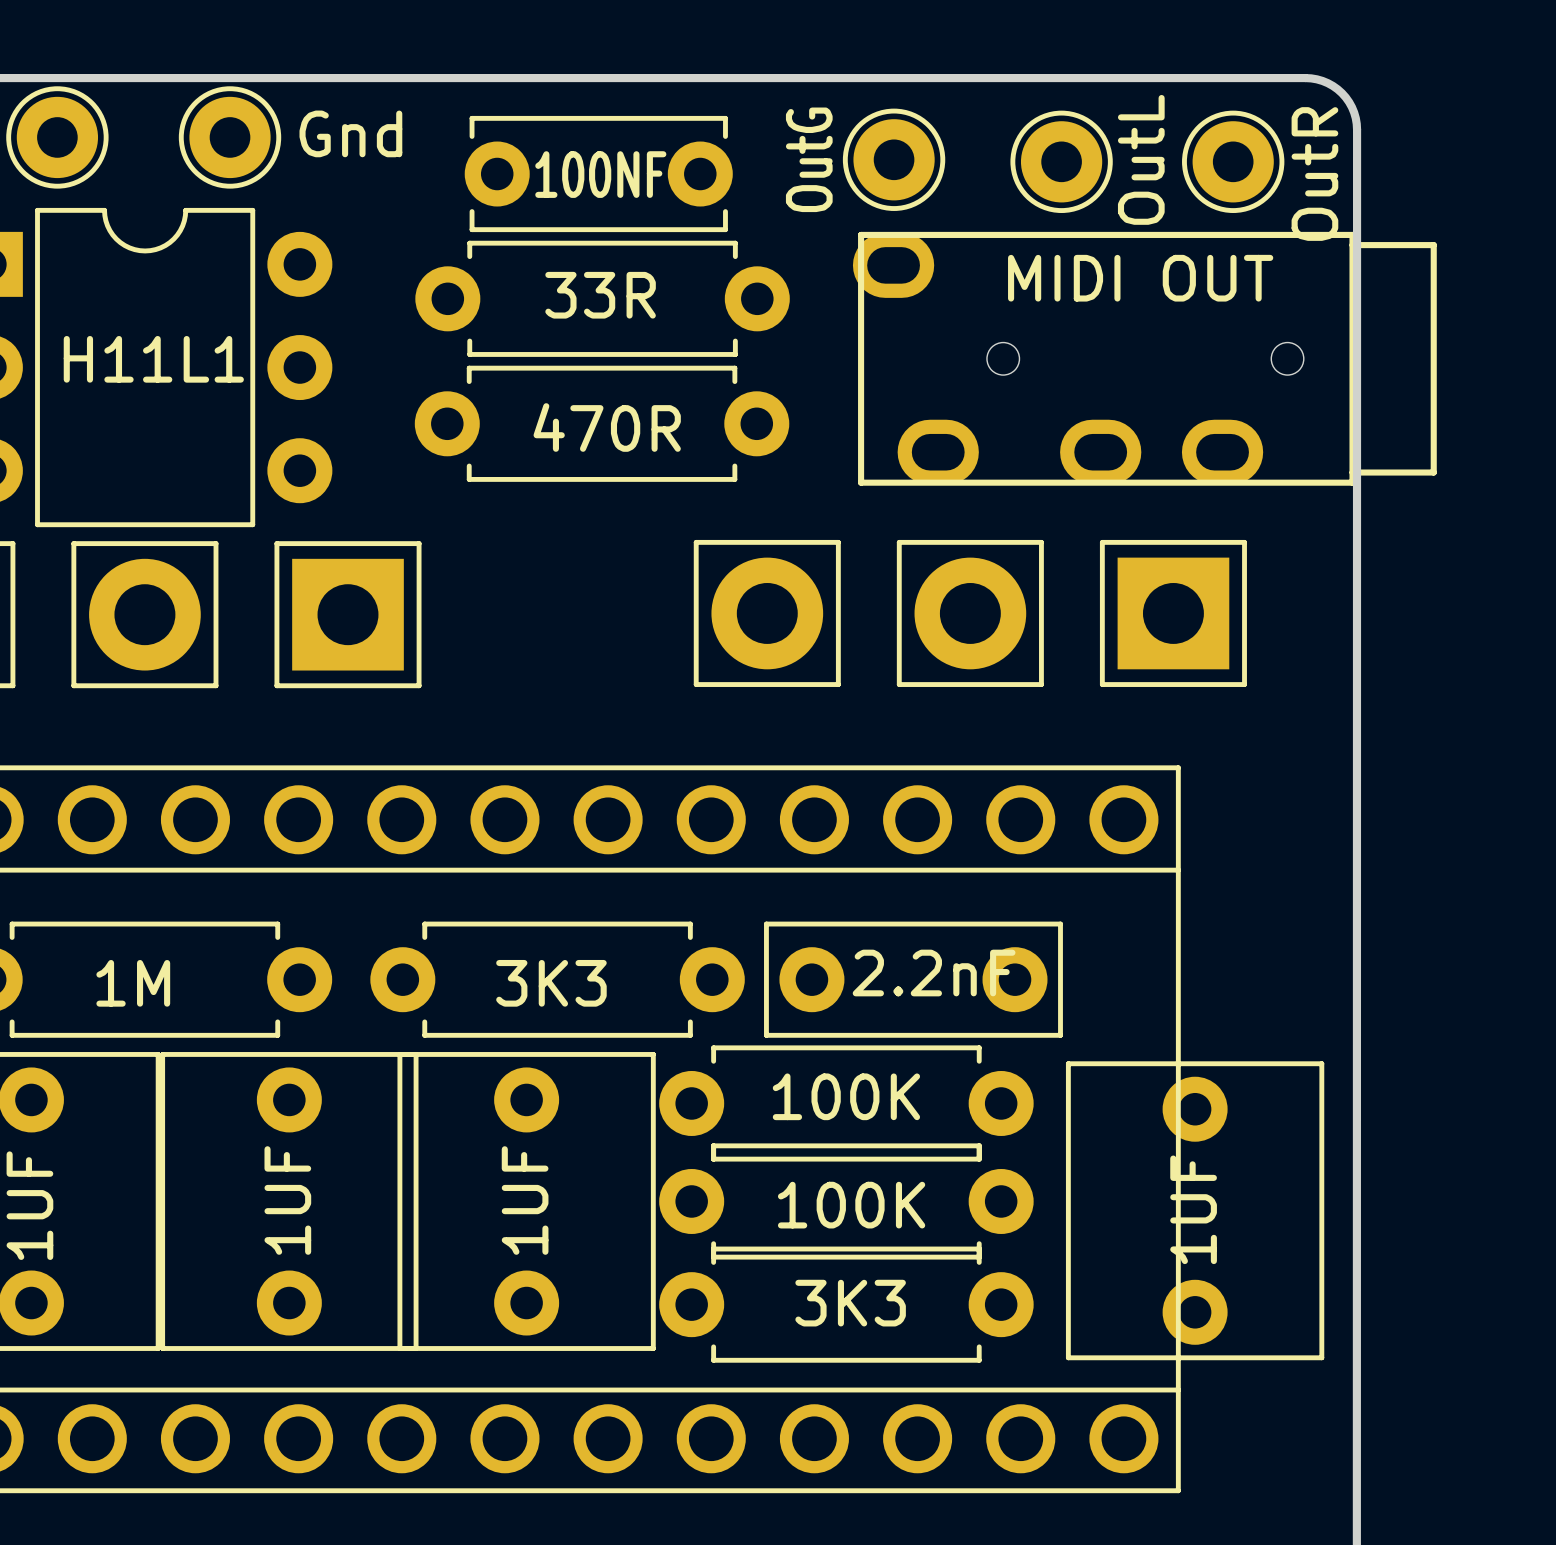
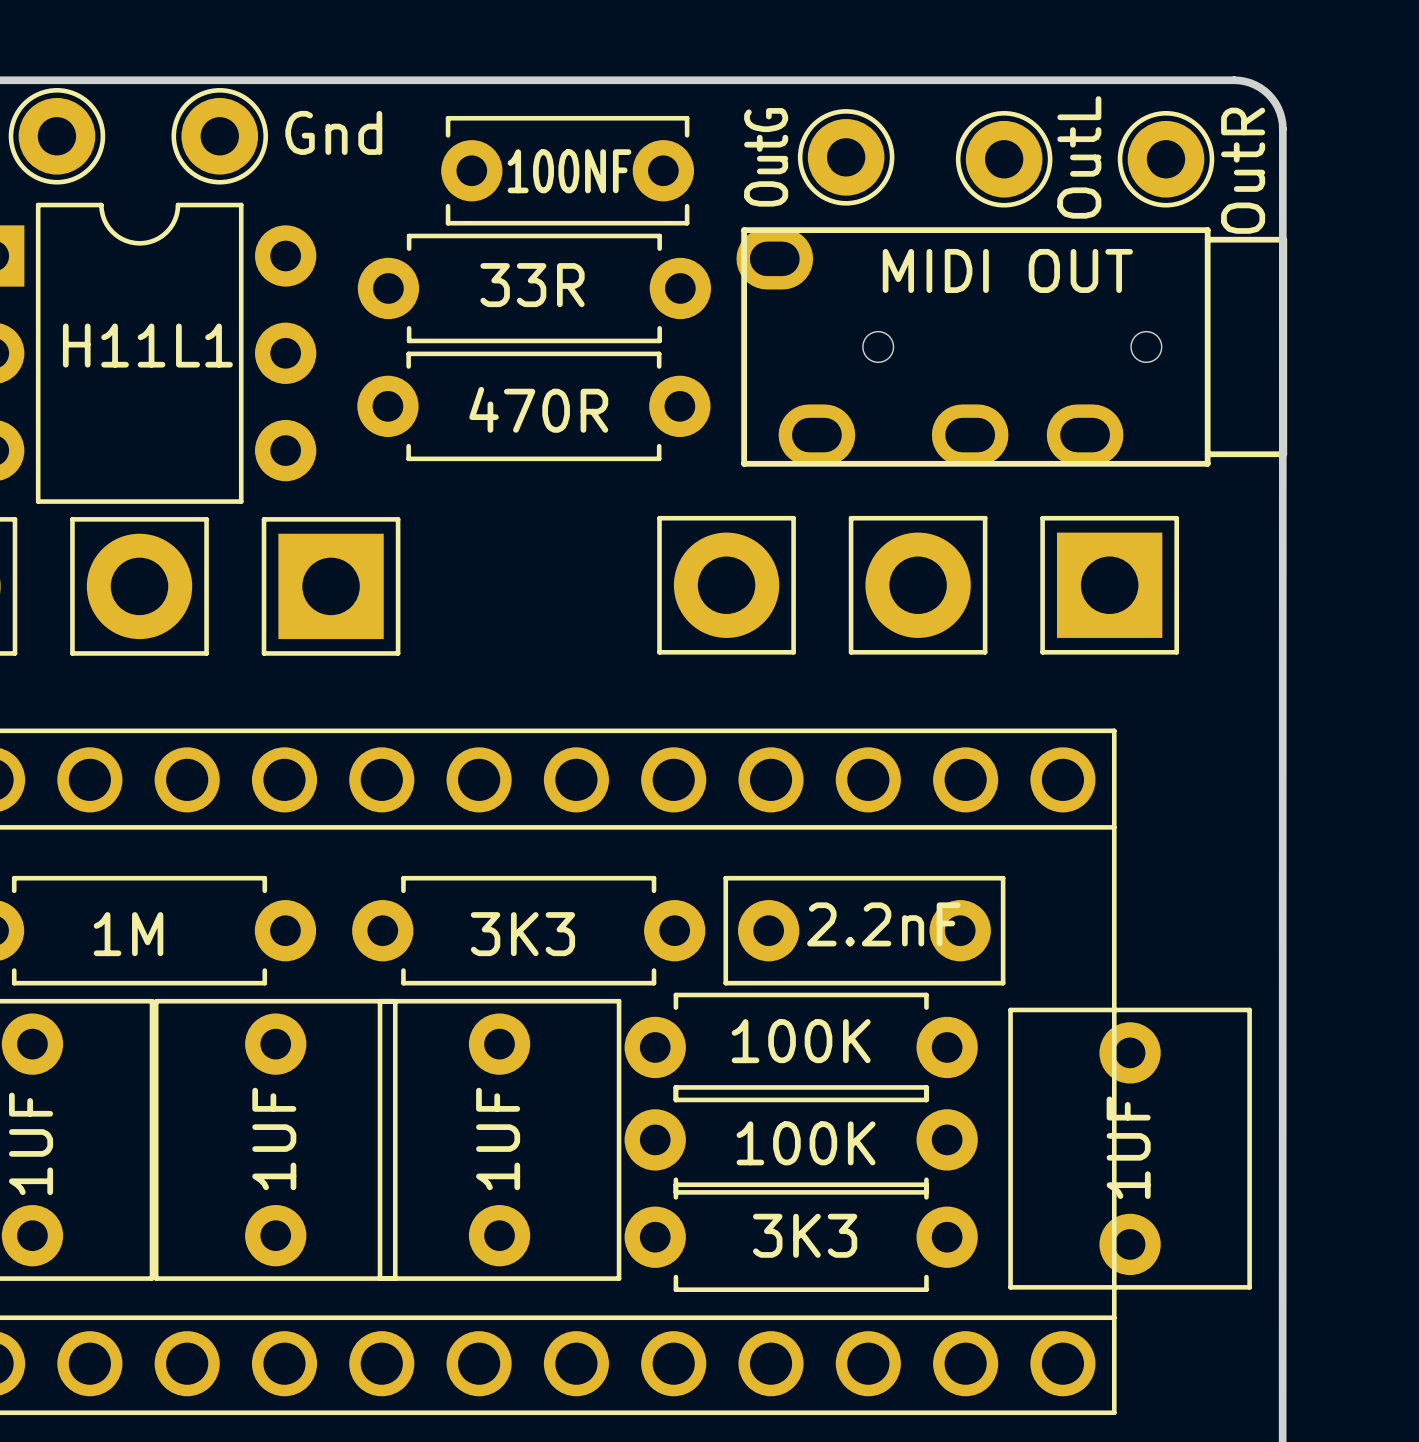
part position: (602, 298) -> (534, 288)
part position: (1144, 358) -> (1011, 346)
part position: (602, 423) -> (533, 406)

